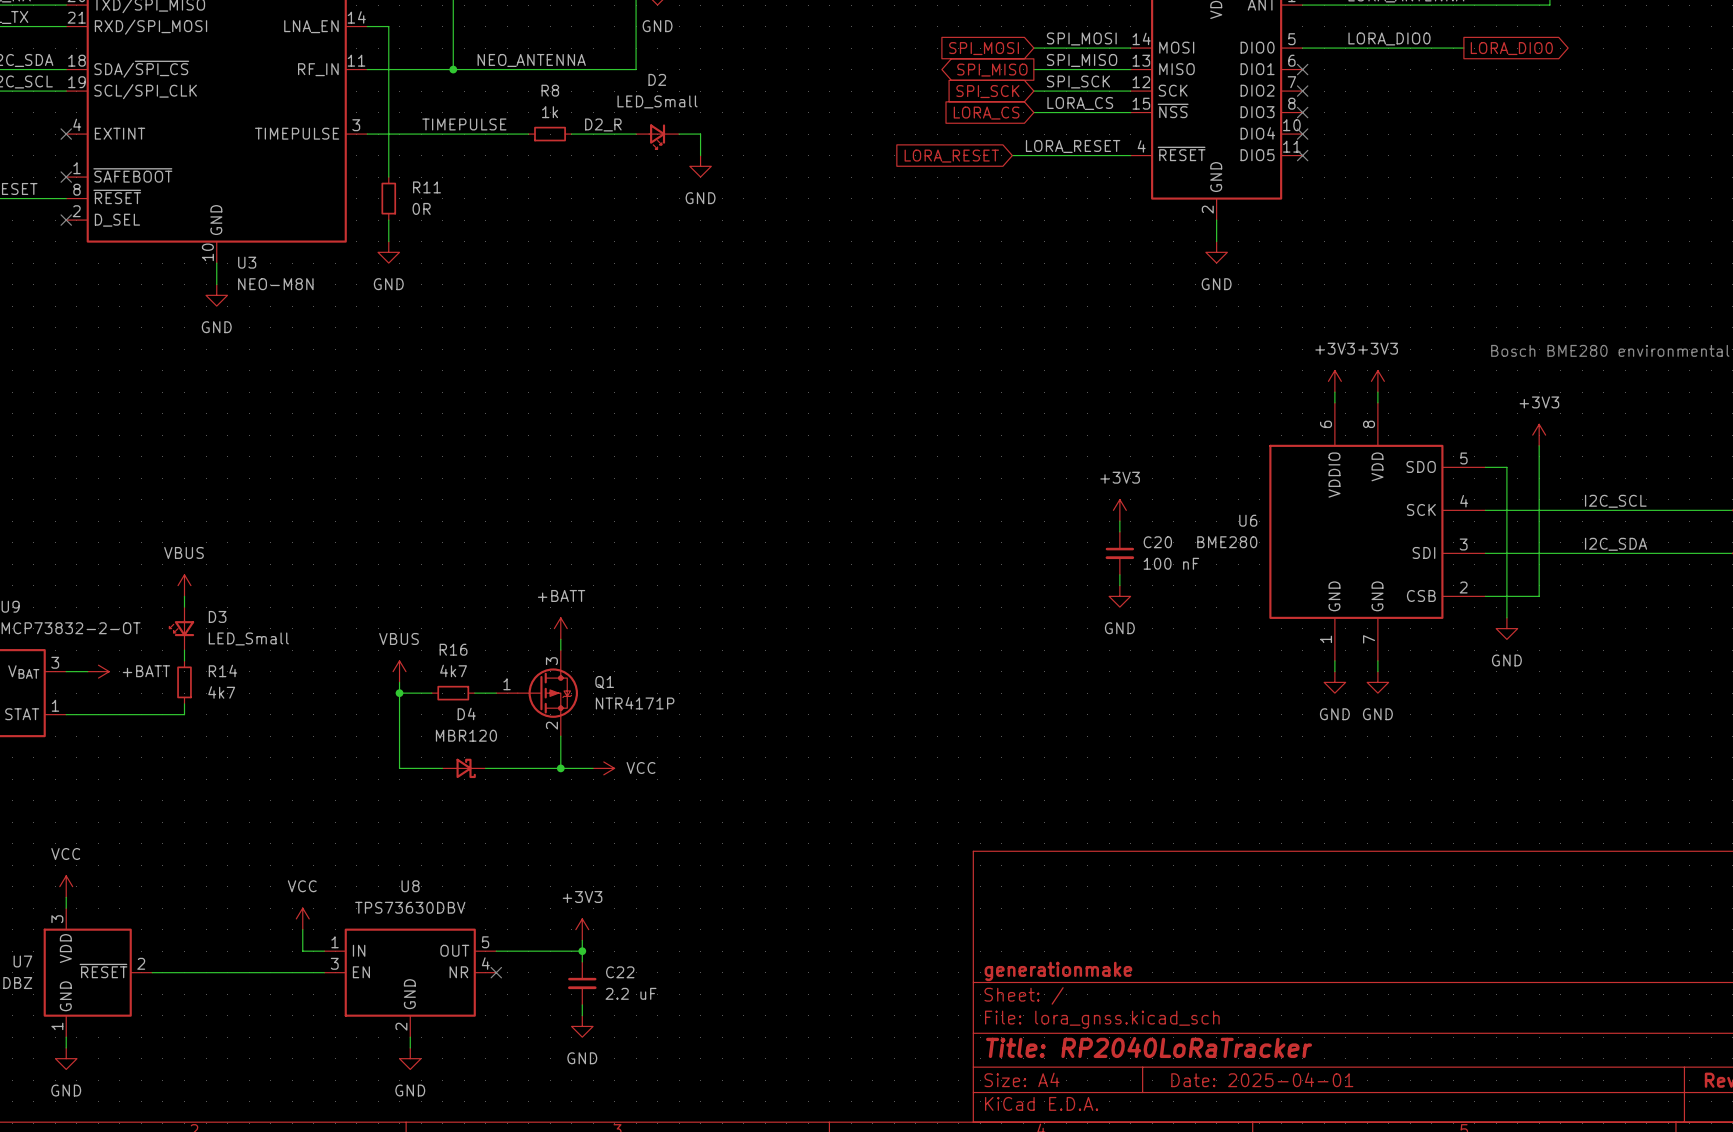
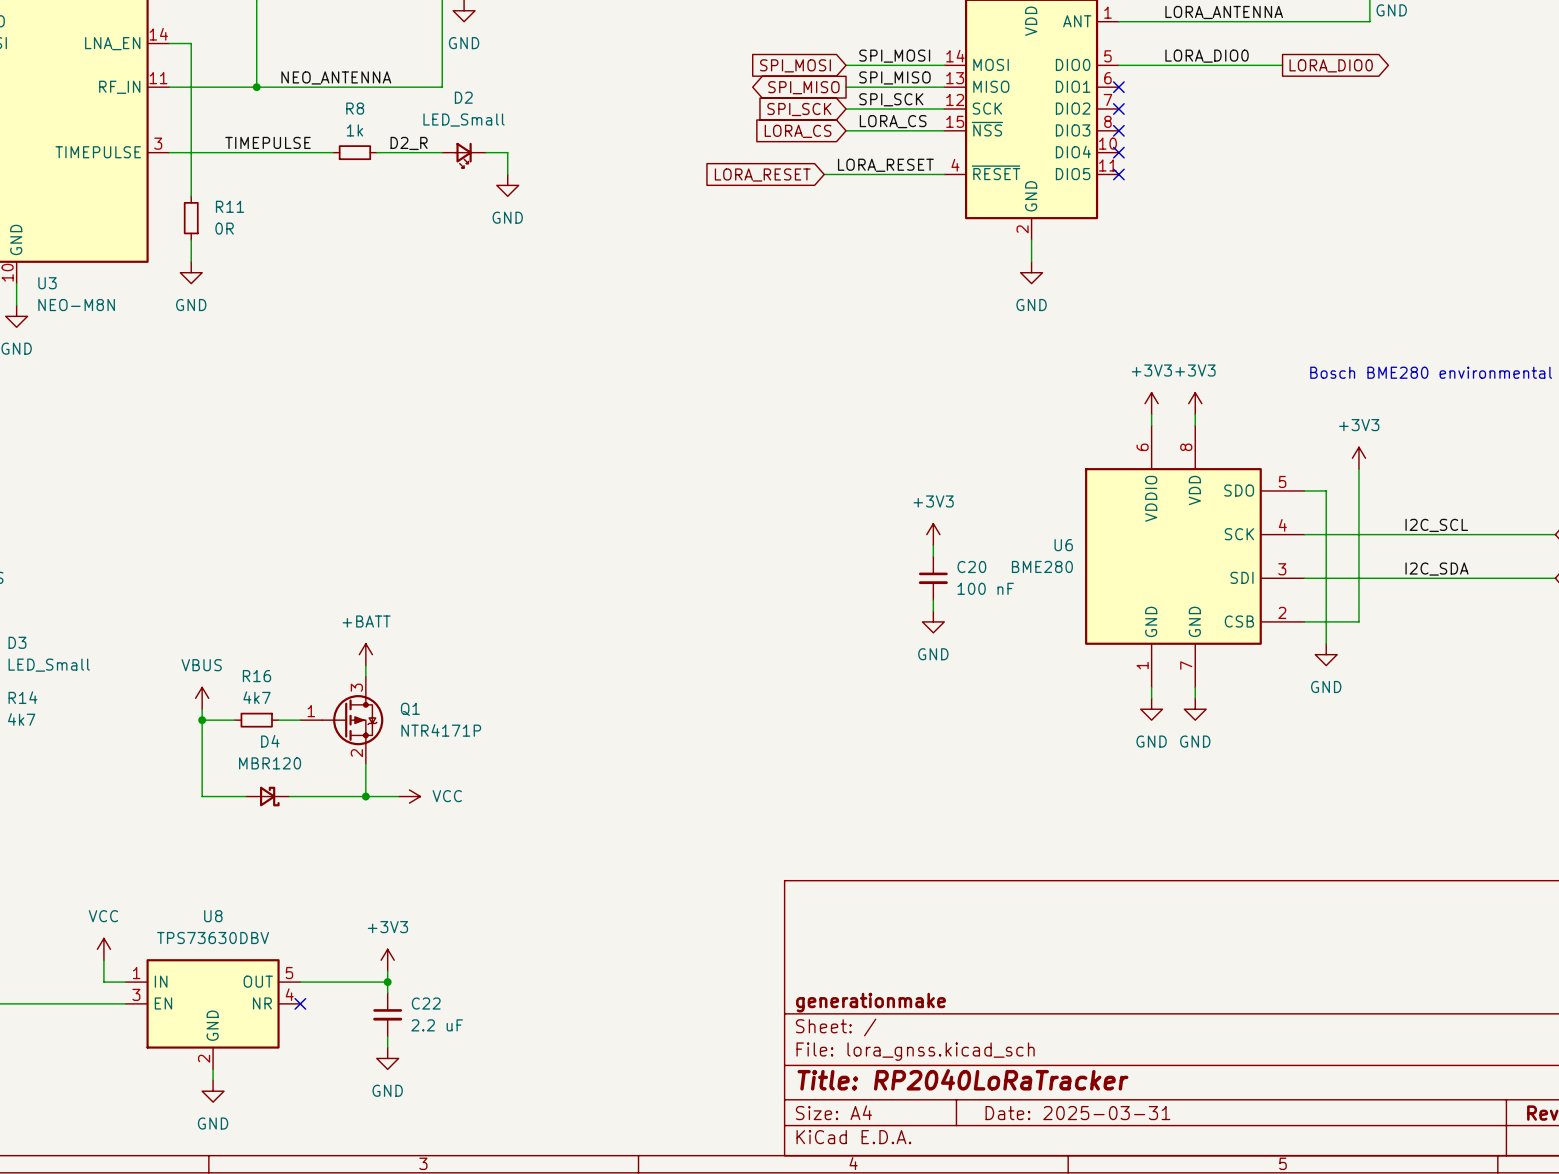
title block: Date: 2025-04-01 (1262, 1079) -> Date: 2025-03-31 (1077, 1113)

